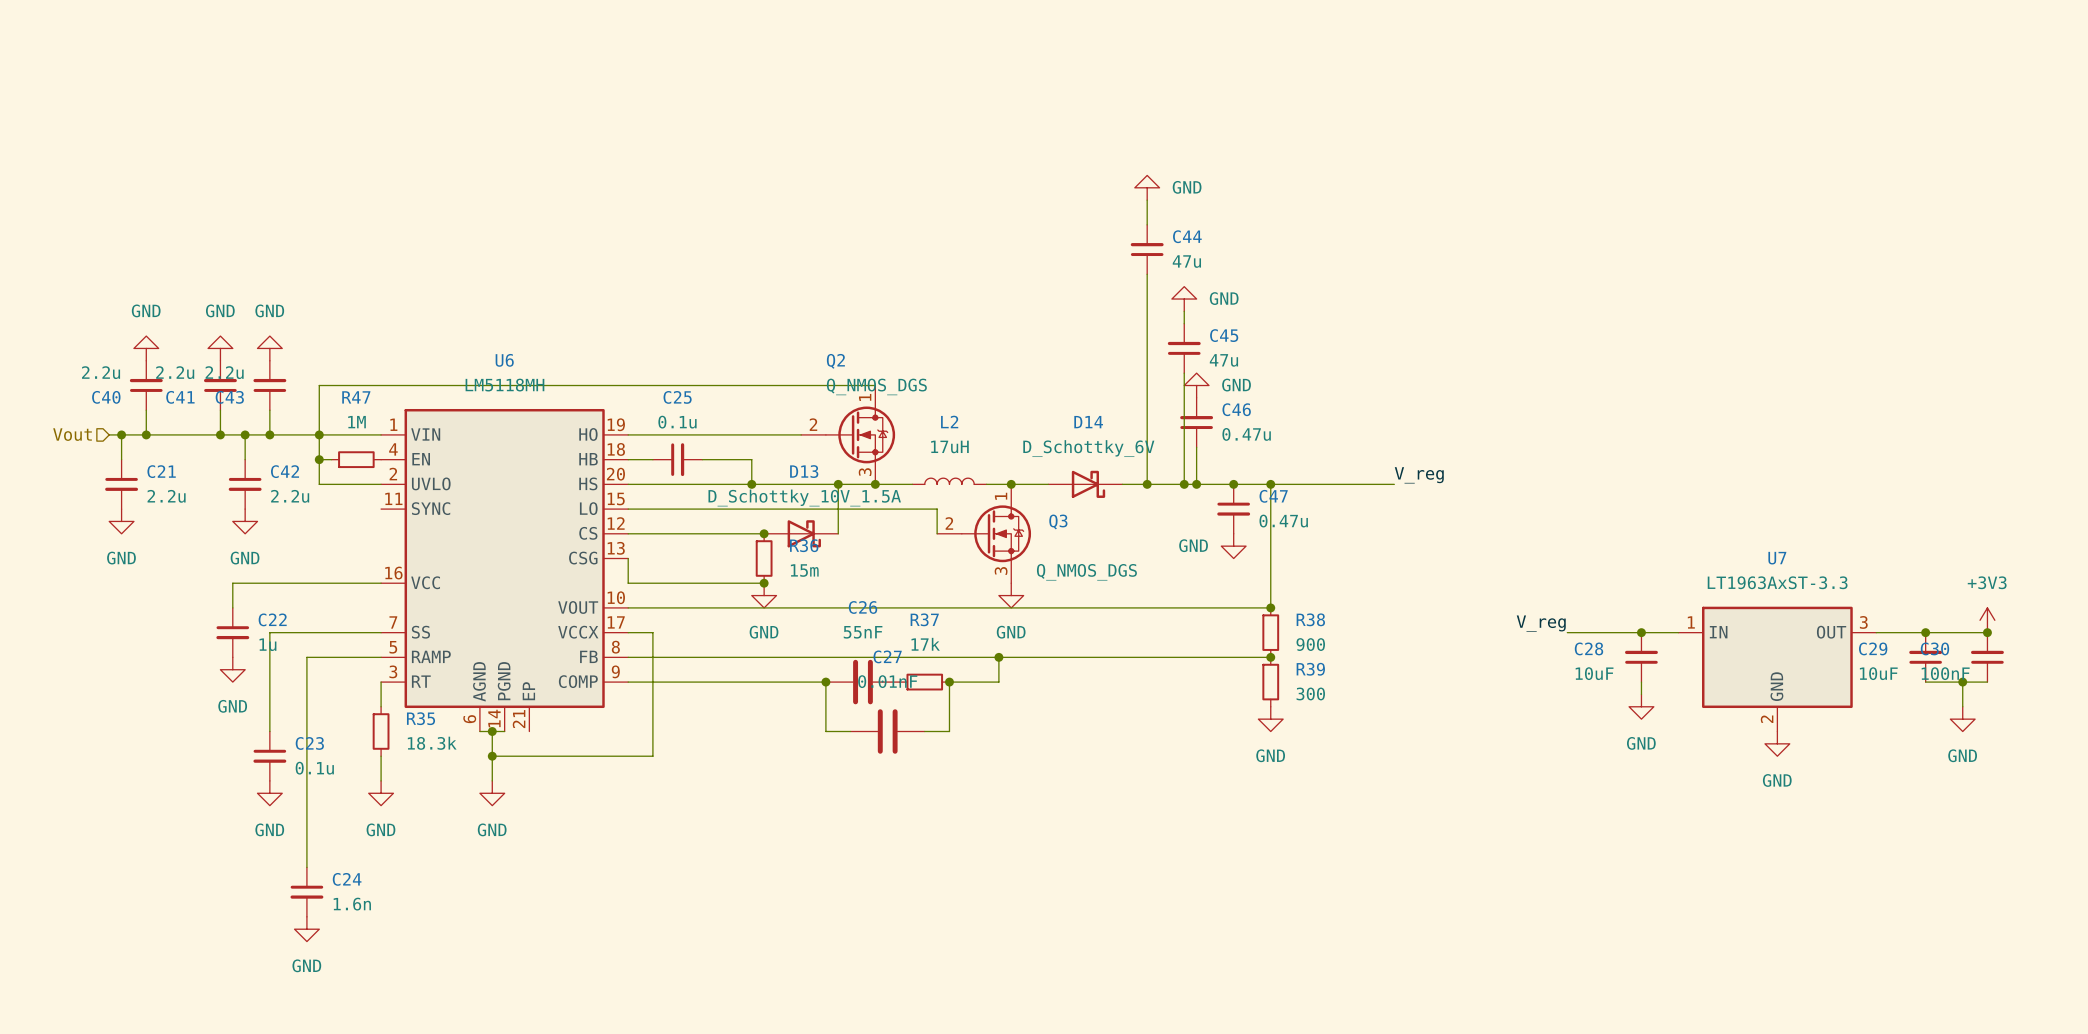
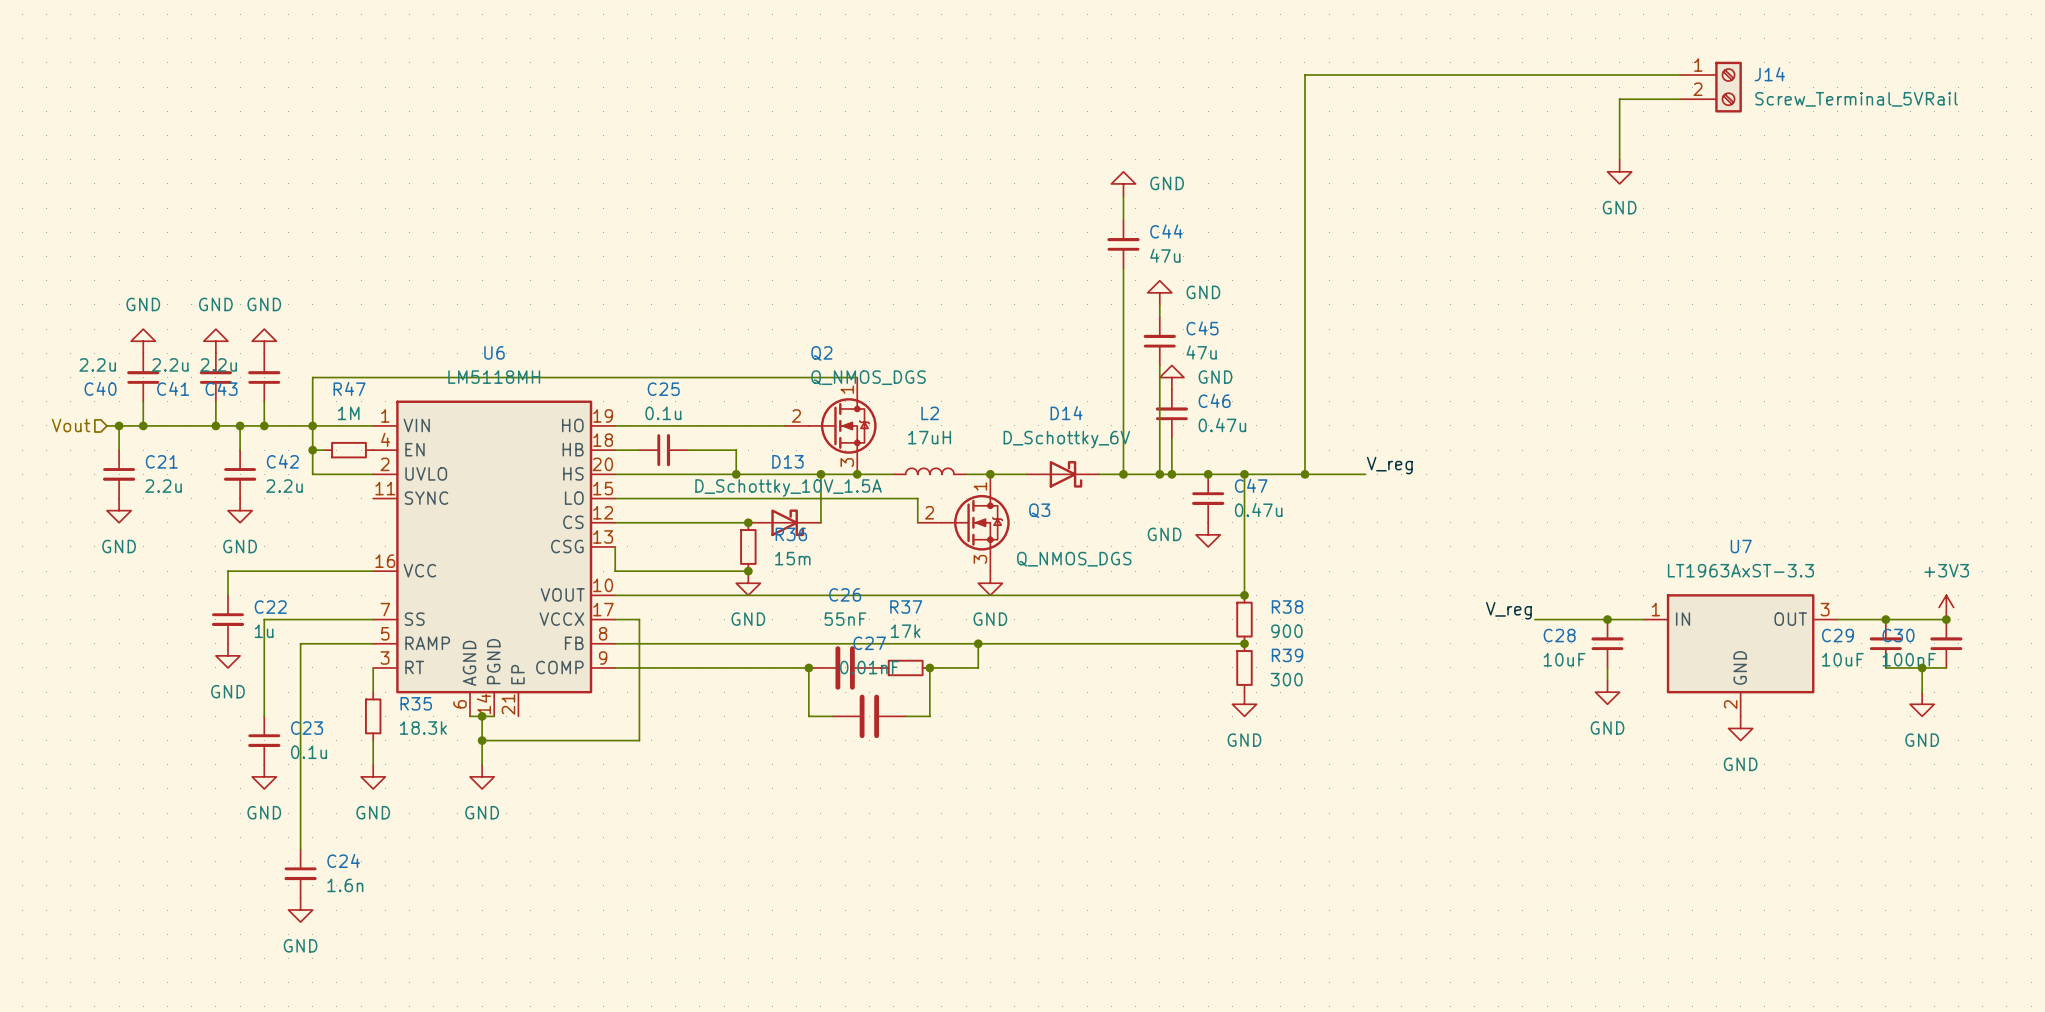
wire: none -> (1680, 75) (1304, 75) (1304, 474)
J14: none -> Screw_Terminal_5VRail (1710, 87)
wire: none -> (1680, 99) (1619, 99) (1619, 159)
power symbol: none -> GND (1619, 171)
junction: none -> (1304, 474)

